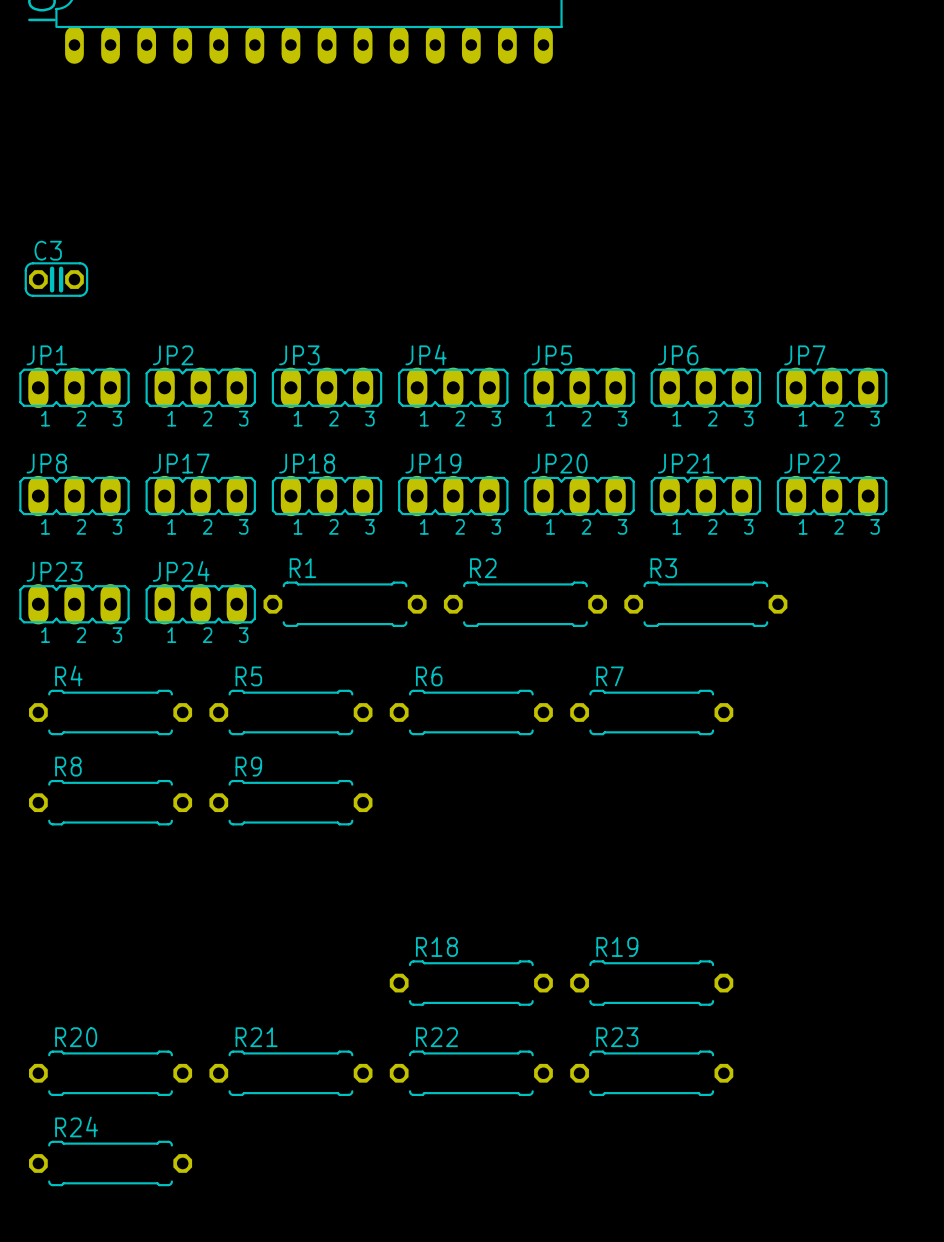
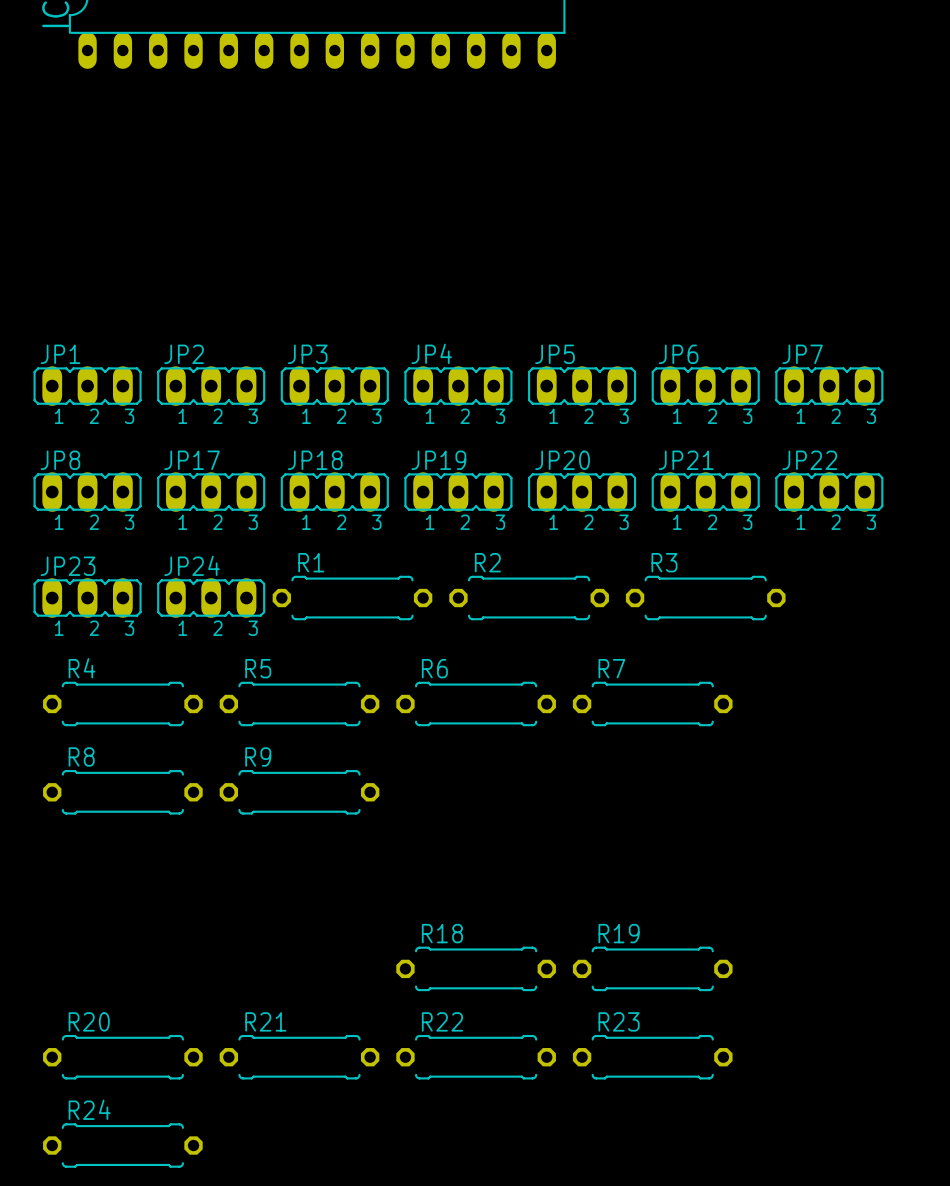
C3: (56, 279) -> none

